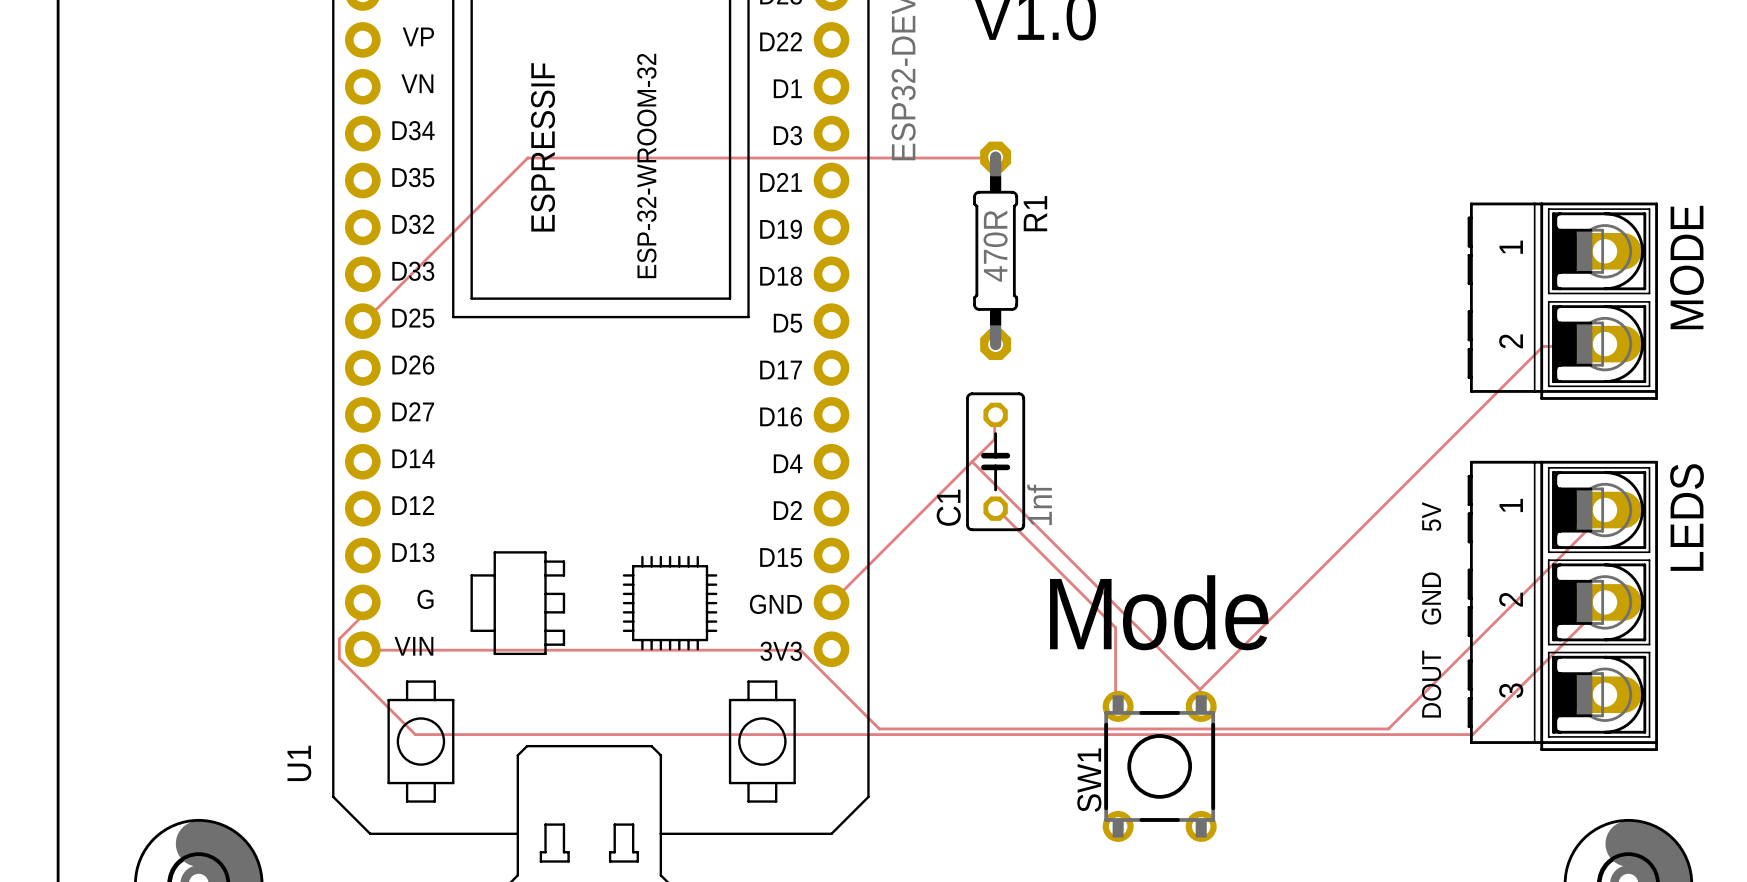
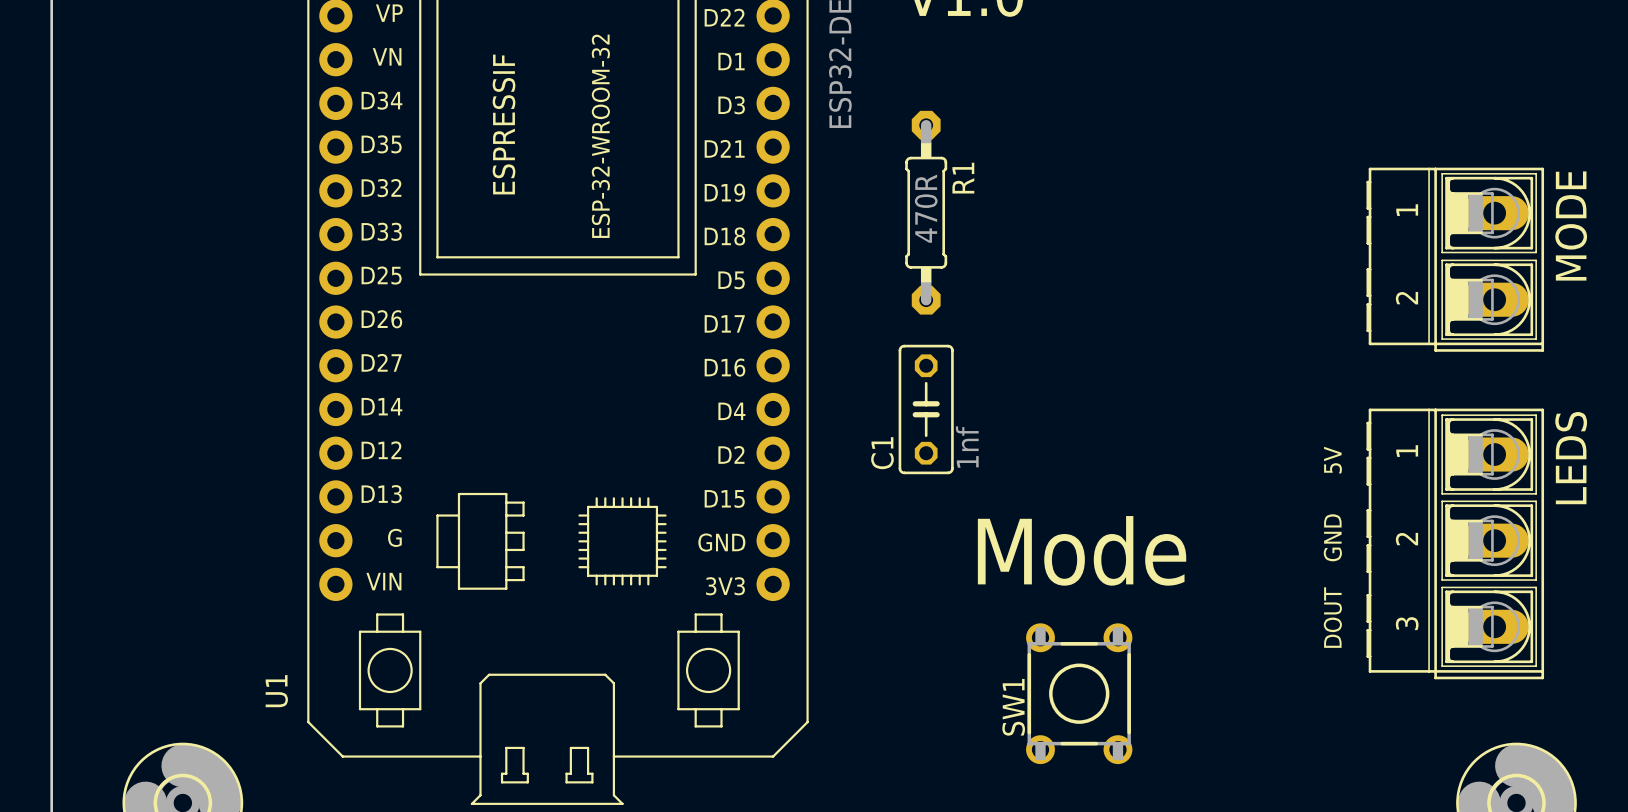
track: (995, 157) (527, 158) (362, 321) -> none
track: (1604, 344) (1604, 346) (1543, 346) (1199, 689) -> none
track: (995, 414) (994, 439) (831, 602) -> none
track: (972, 461) (1199, 689) -> none
track: (995, 508) (1115, 627) (1115, 706) (1118, 706) -> none
track: (1604, 510) (1604, 512) (1388, 728) (879, 728) (800, 650) (362, 649) -> none
track: (362, 602) (361, 616) (339, 638) (339, 658) (415, 734) (1472, 734) (1604, 602) -> none

